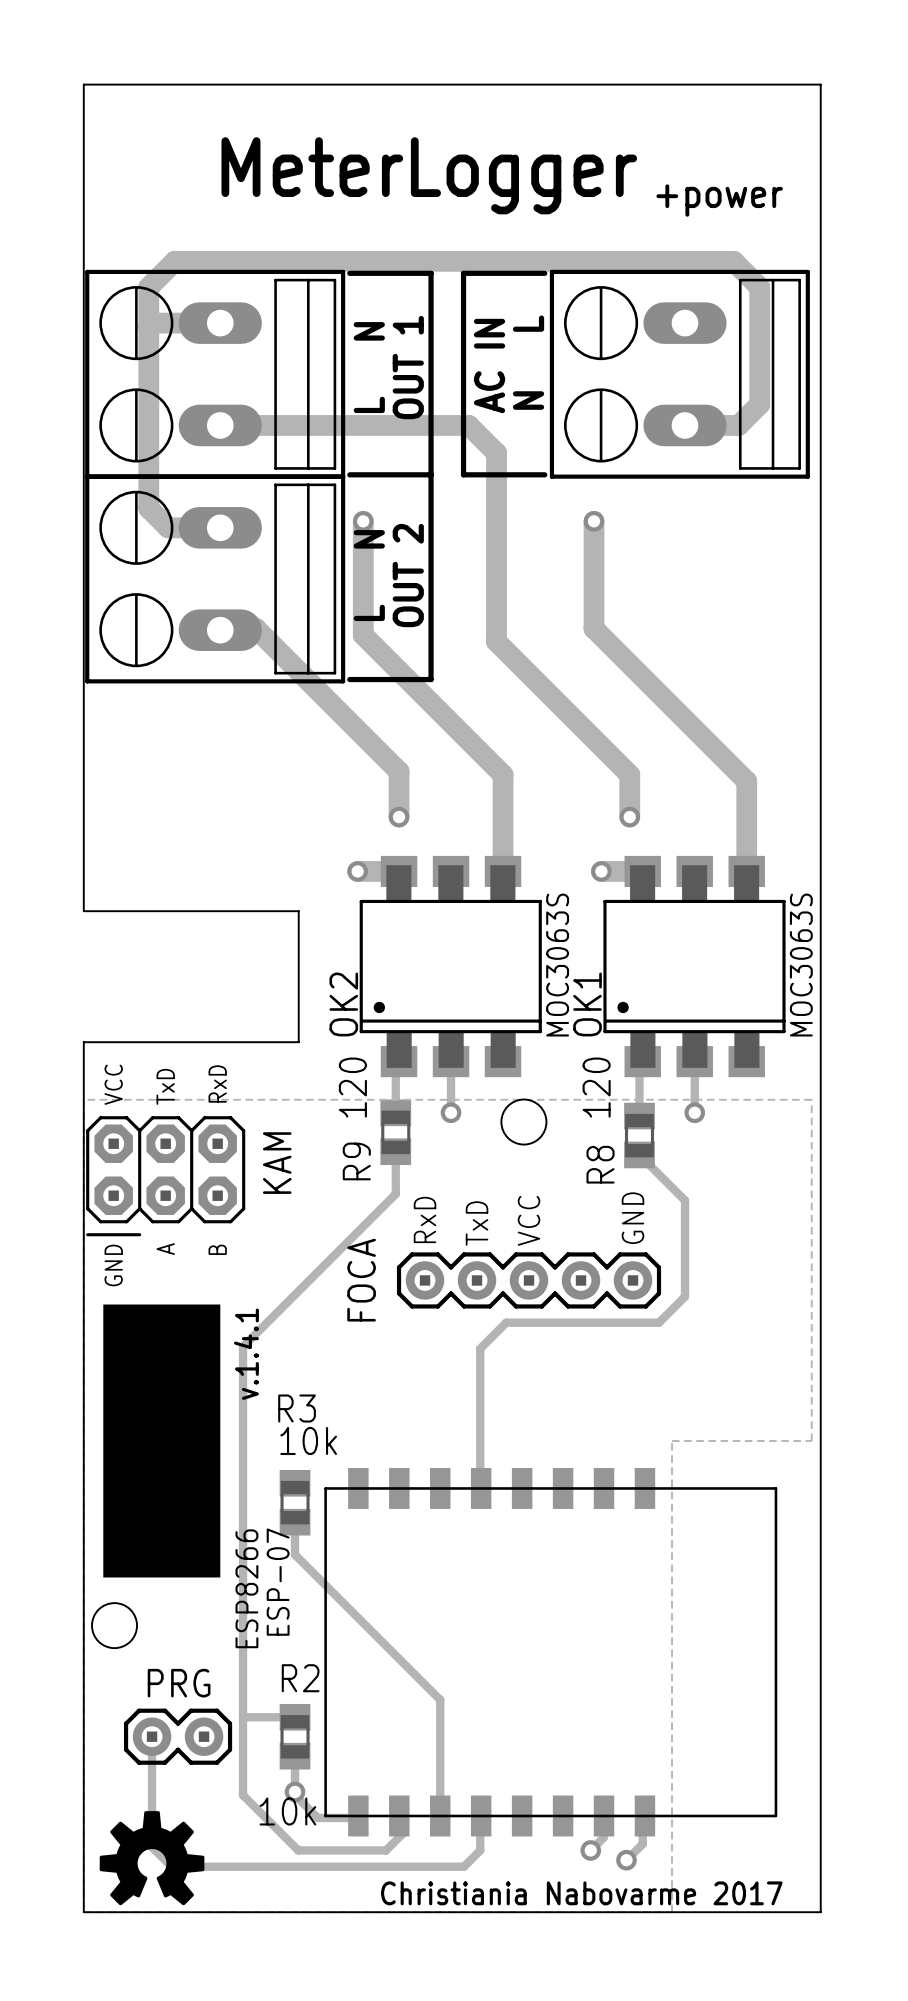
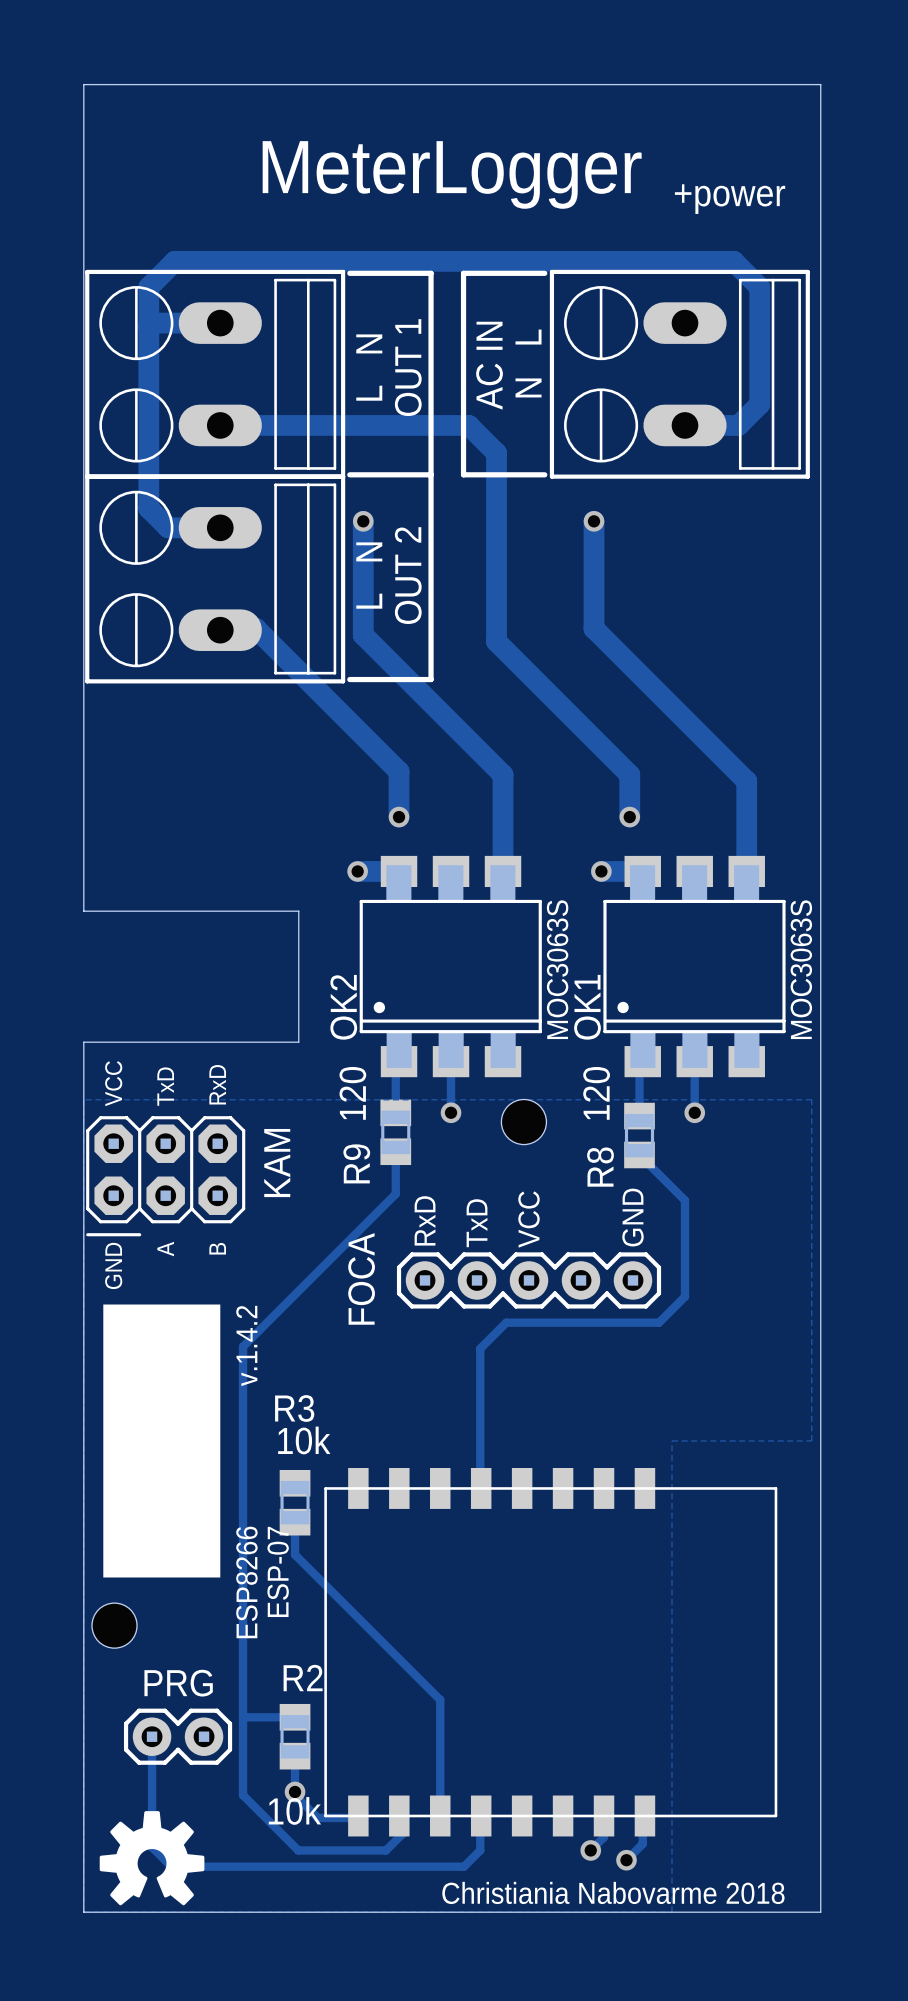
text: v.1.4.1 (246, 1354) -> v.1.4.2 (246, 1345)
text: Christiania Nabovarme 2017 (581, 1893) -> Christiania Nabovarme 2018 (613, 1892)

